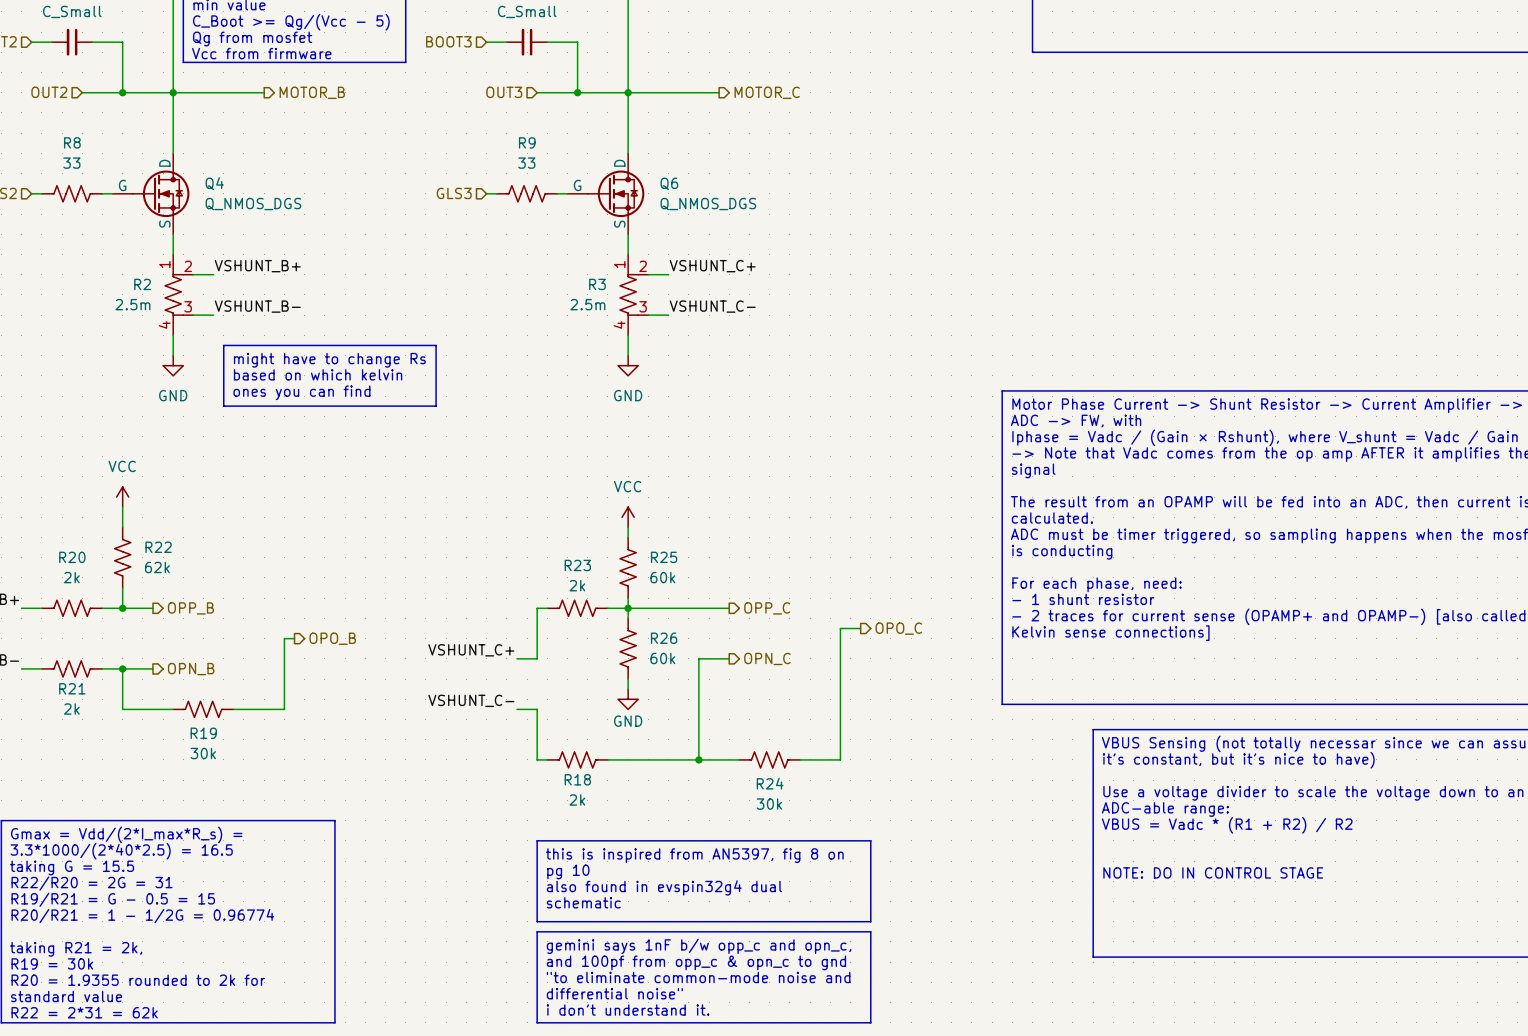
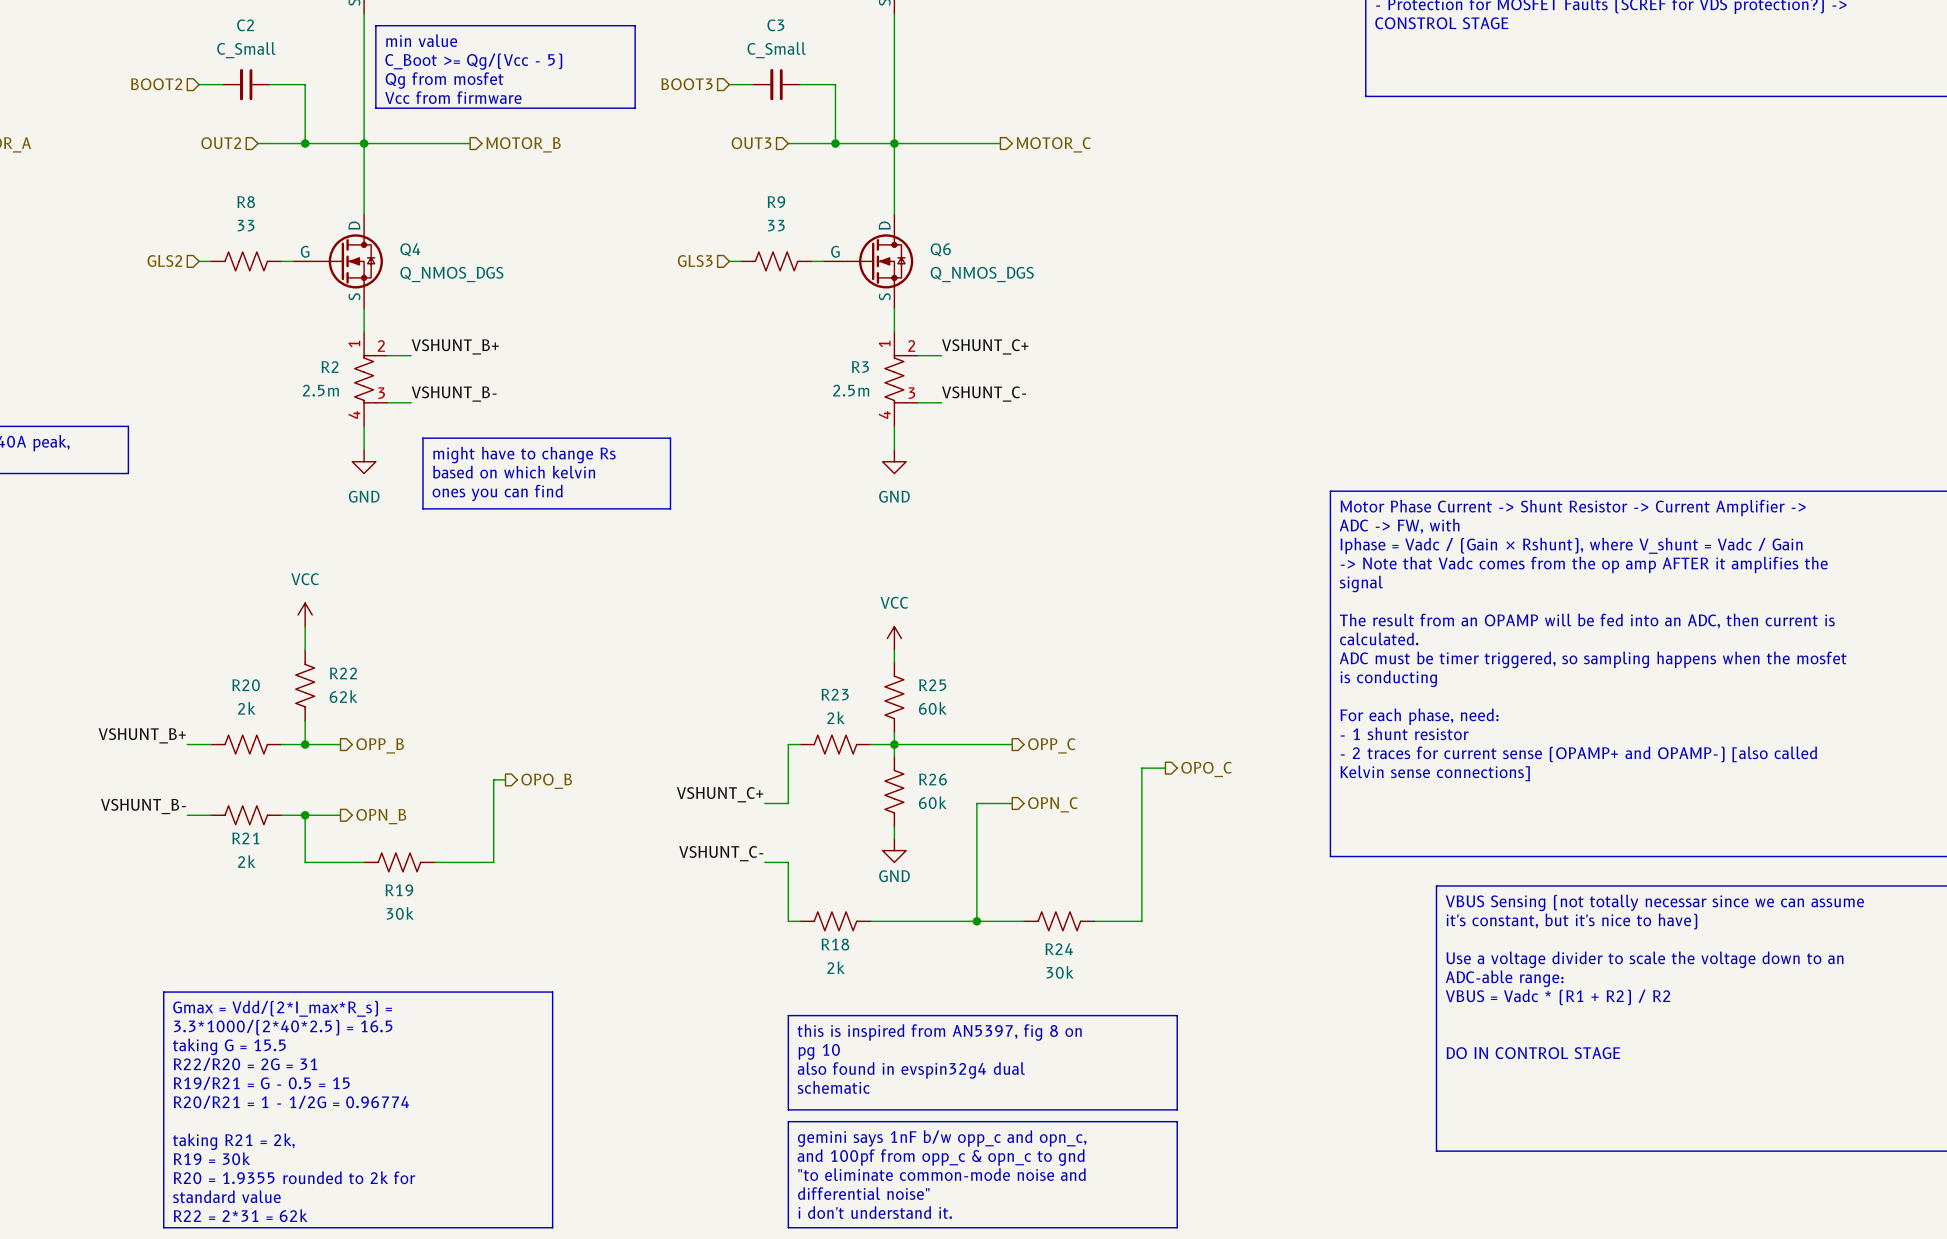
text: NOTE: DO IN CONTROL STAGE (1213, 872) -> DO IN CONTROL STAGE (1533, 1053)

